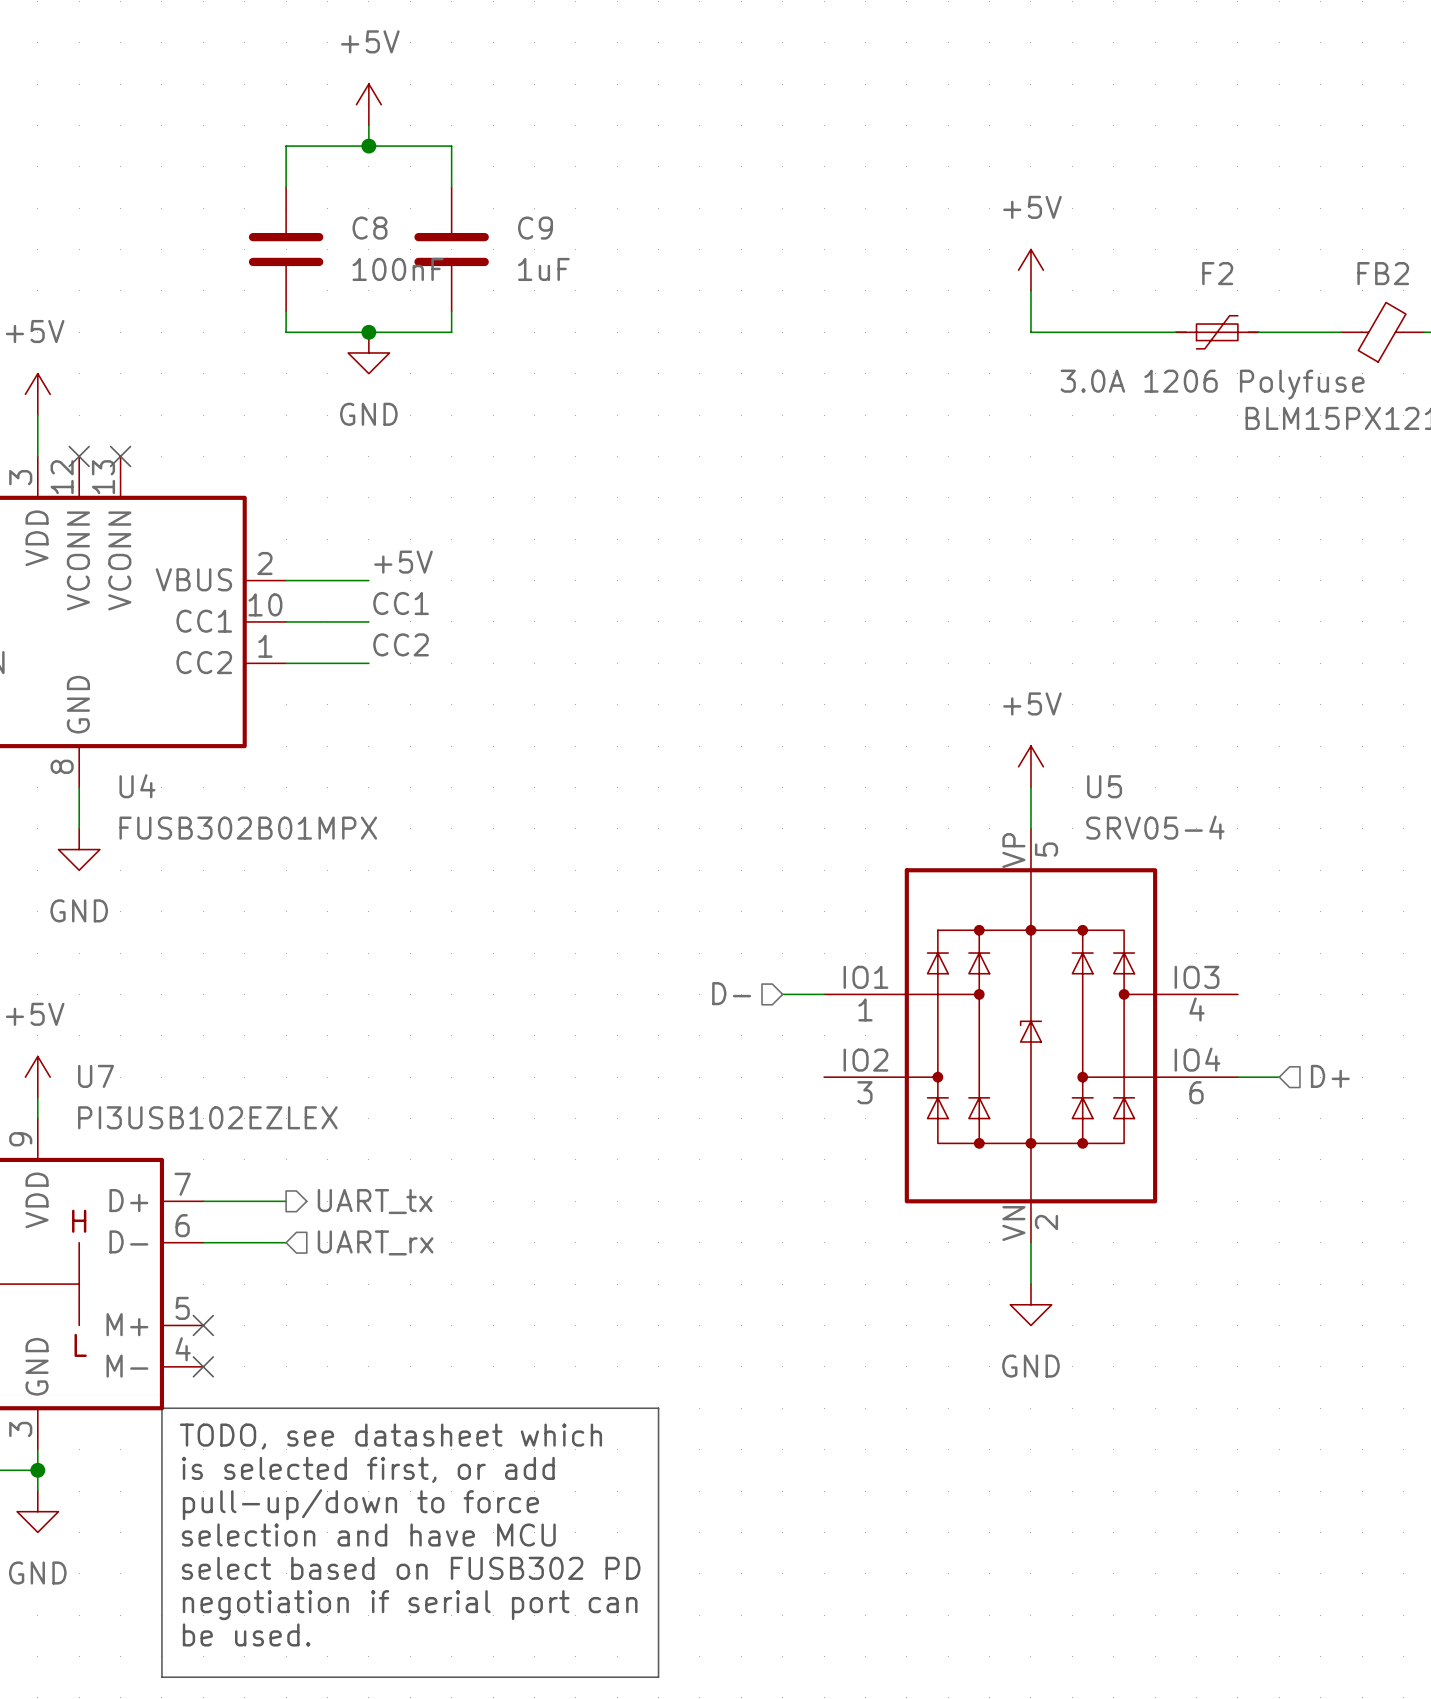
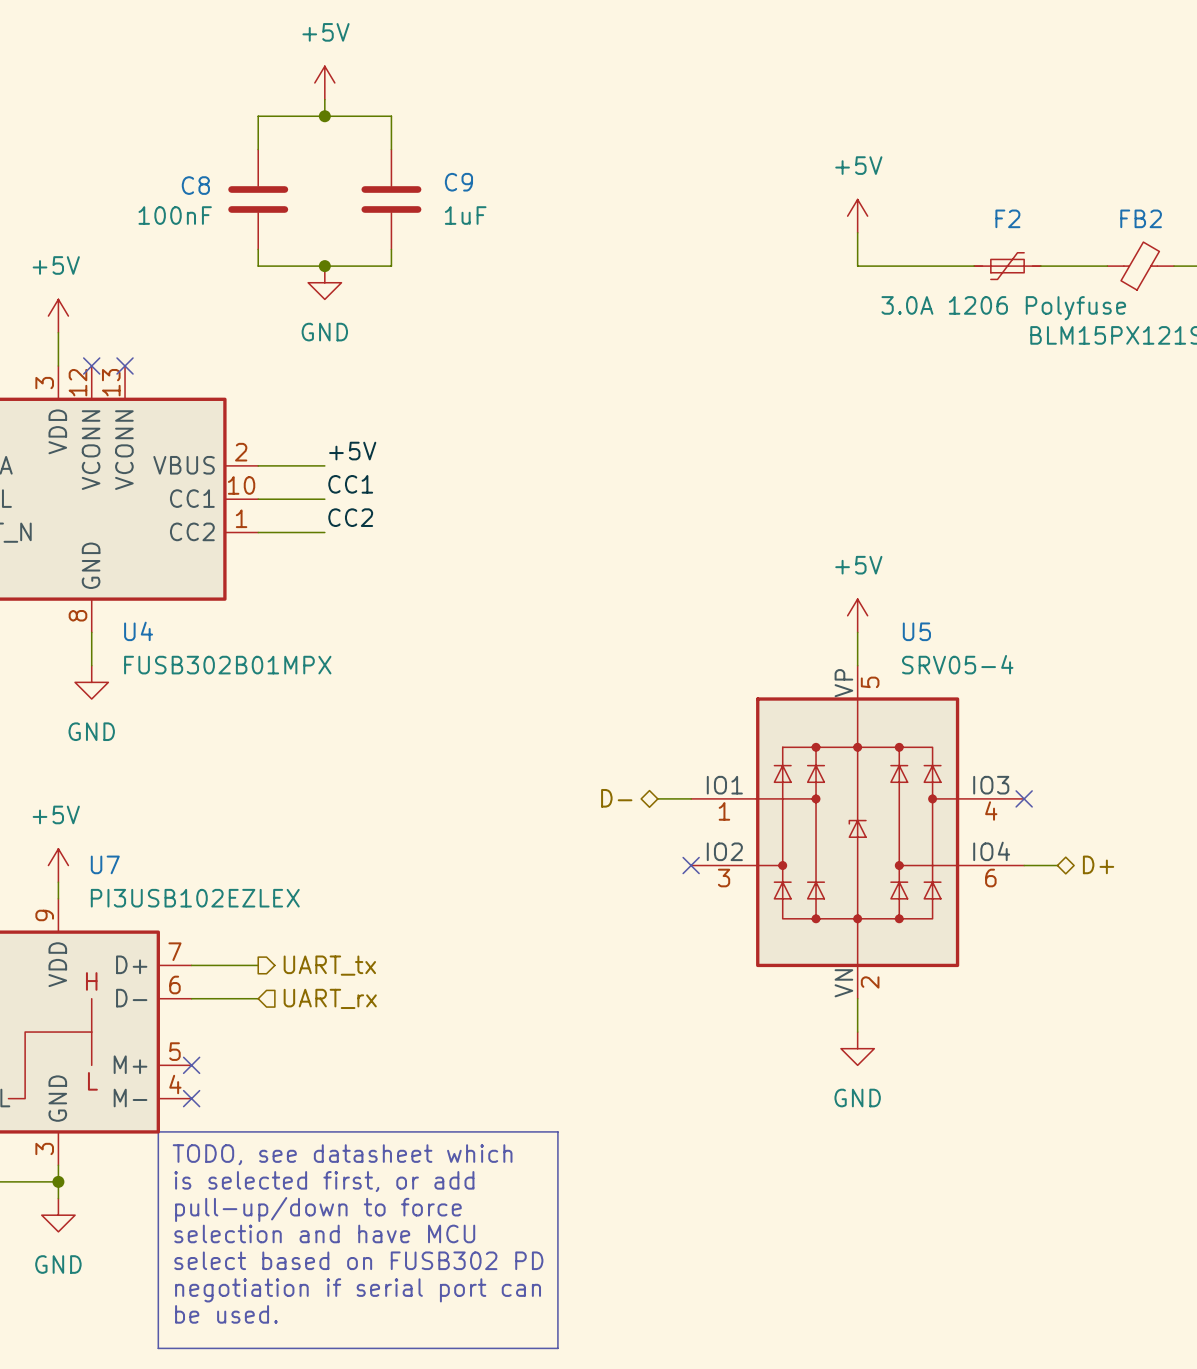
C8 name position: C8 (370, 228) -> C8 (195, 185)
C8 value position: 100nF (398, 269) -> 100nF (175, 215)
hierarchical label shape: input (731, 993) -> bidirectional (616, 798)
no-connect mark: none -> (1024, 798)
hierarchical label shape: input (1330, 1076) -> bidirectional (1098, 864)
no-connect mark: none -> (691, 865)

